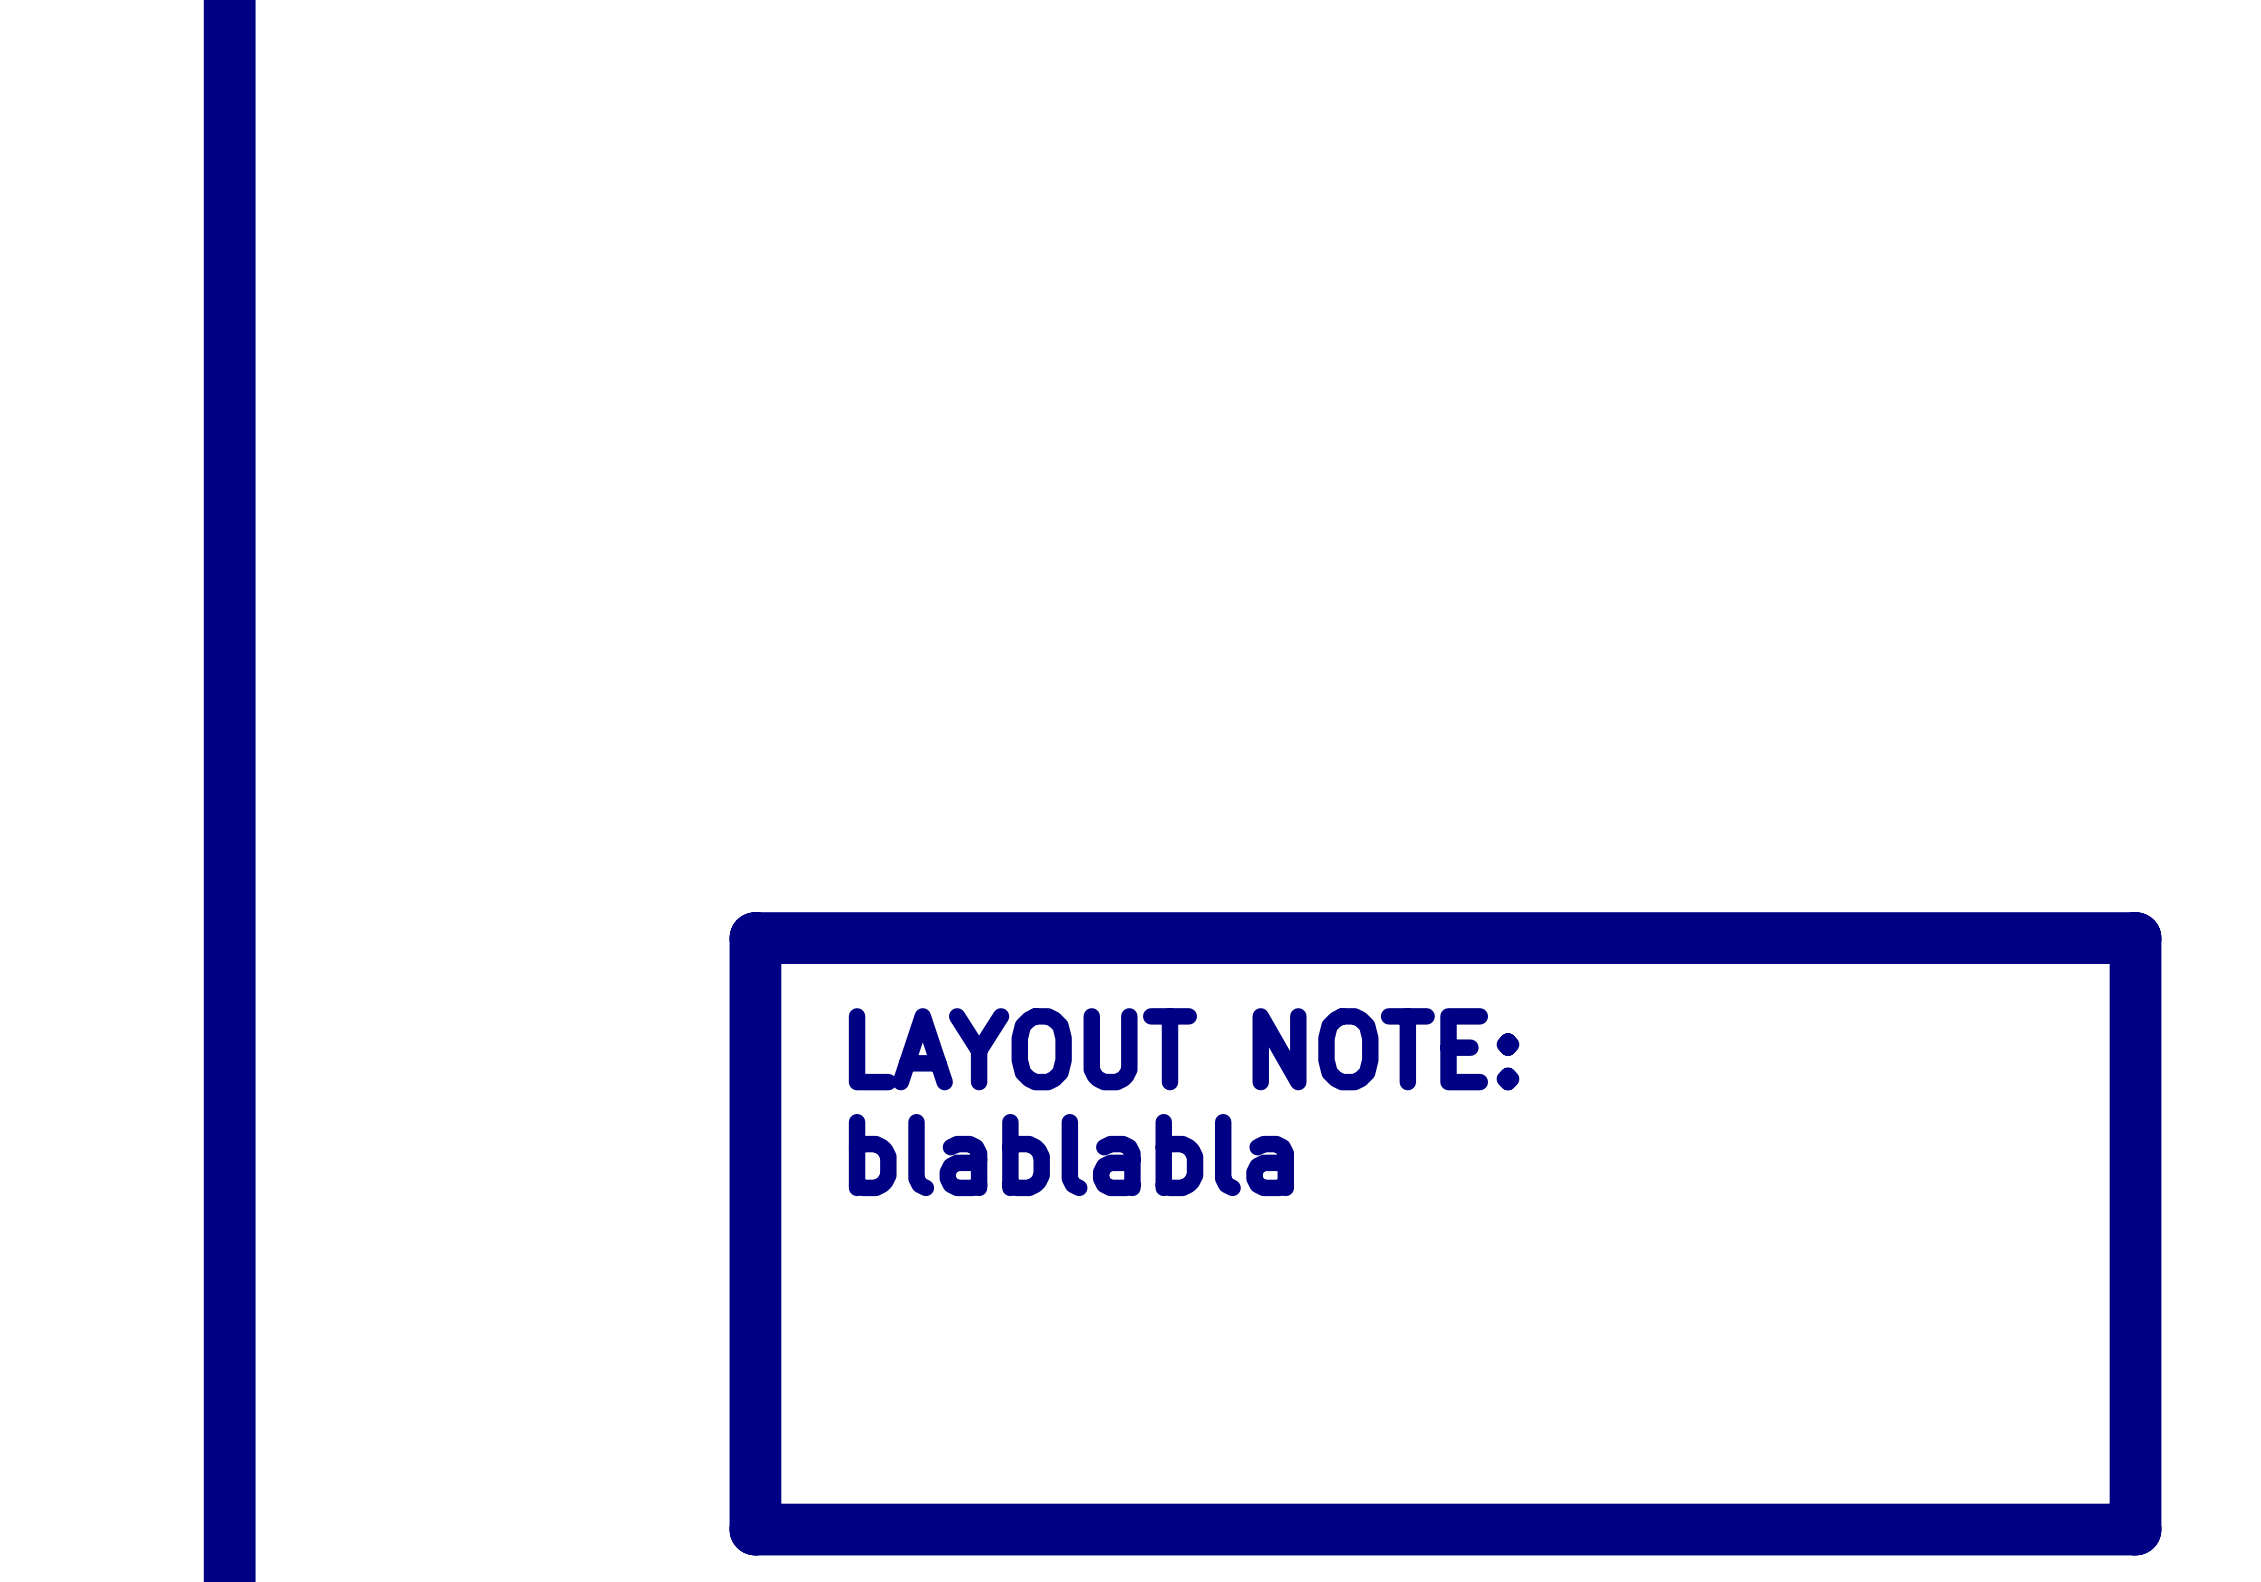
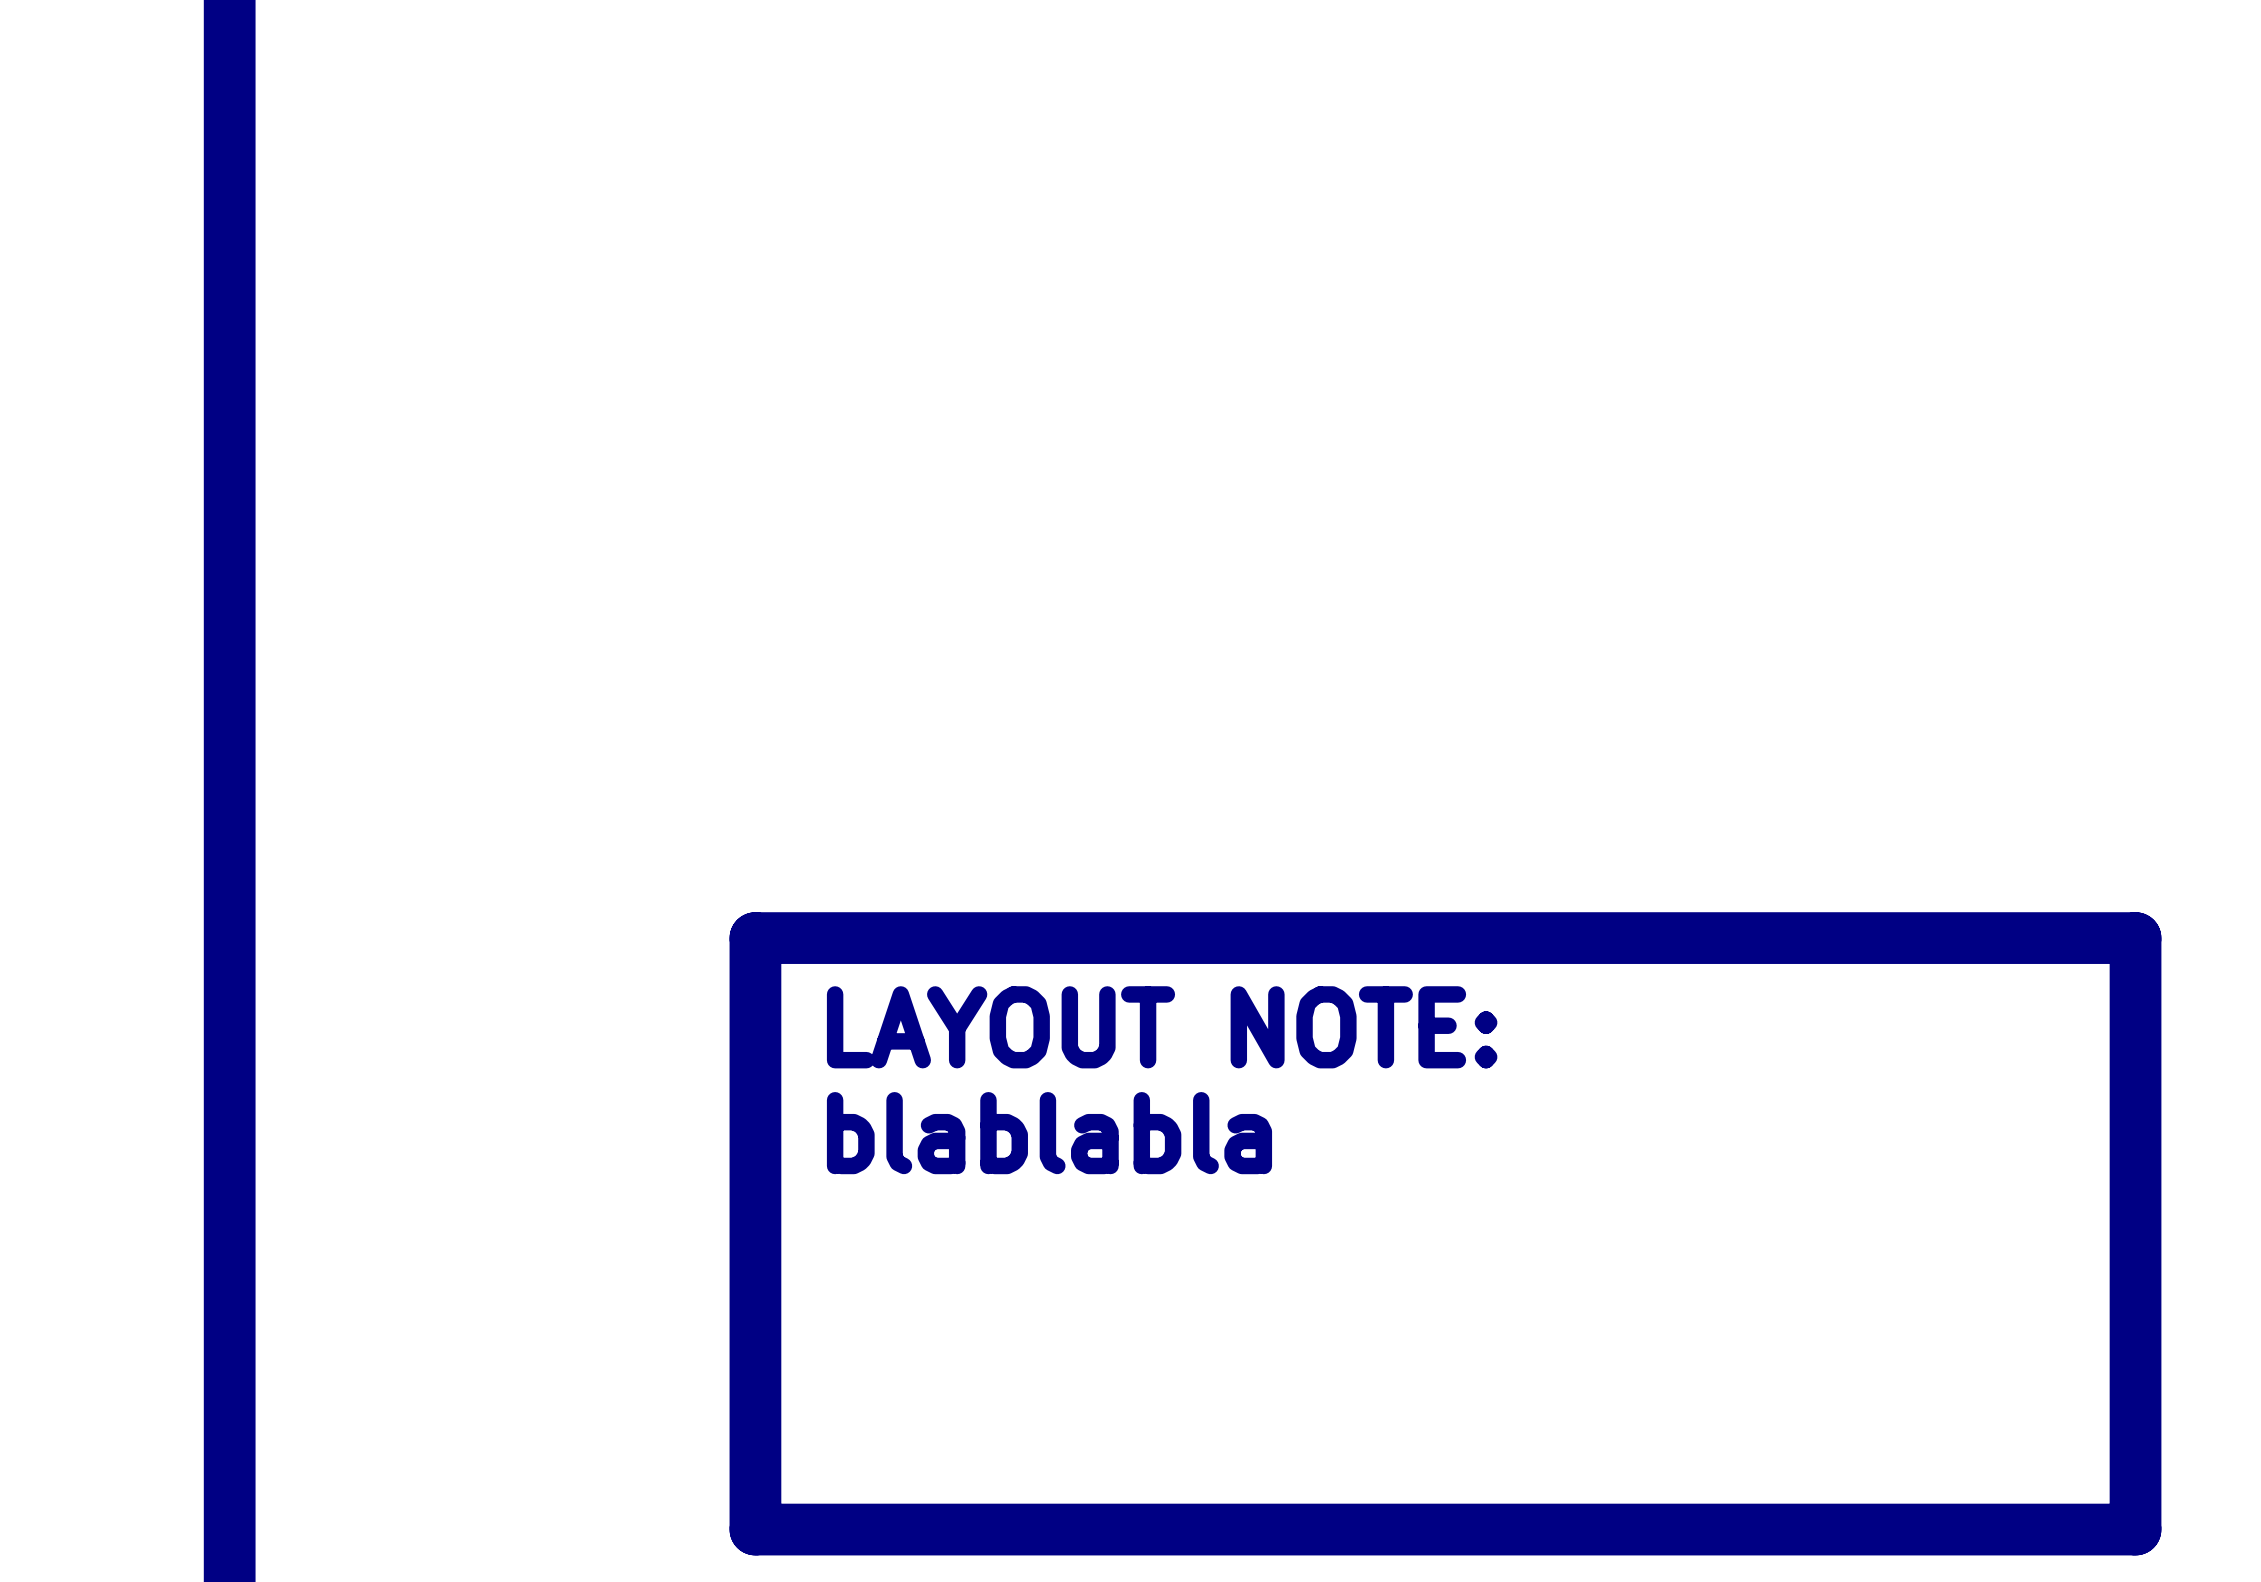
text position: LAYOUT NOTE: (1184, 1049) -> LAYOUT NOTE: (1162, 1027)
text position: blablabla (1071, 1155) -> blablabla (1049, 1133)

